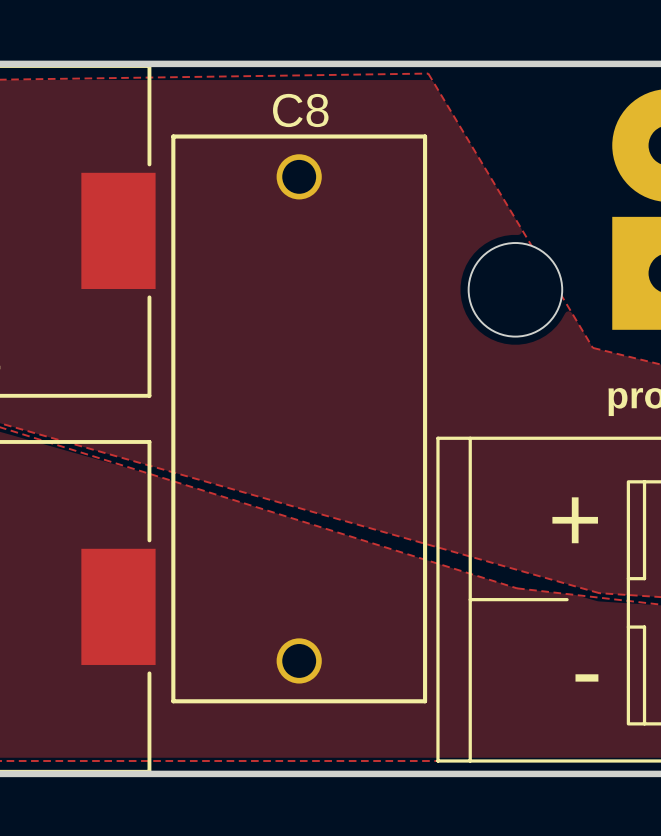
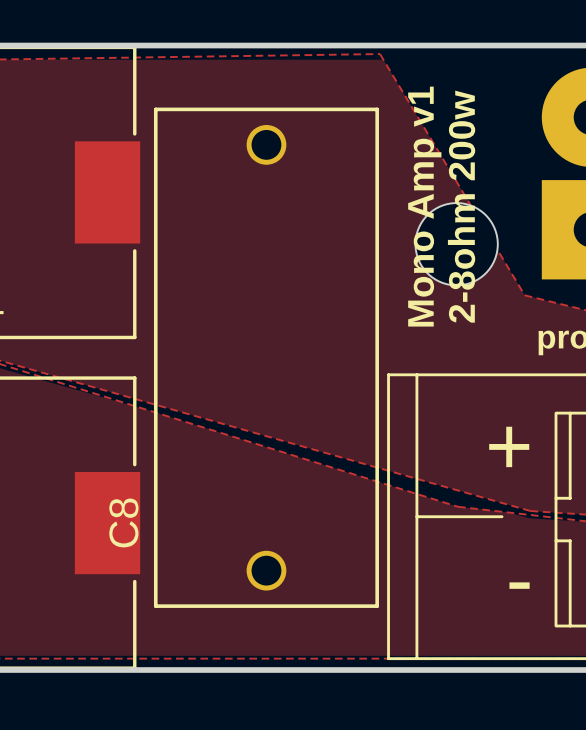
C8 name rotation: 0° (300, 110) -> 90° counterclockwise (123, 522)
C8 name position: C8 (300, 110) -> C8 (123, 522)
text: none -> Mono Amp v1 (424, 206)
text: none -> 2-8ohm 200w (461, 206)

